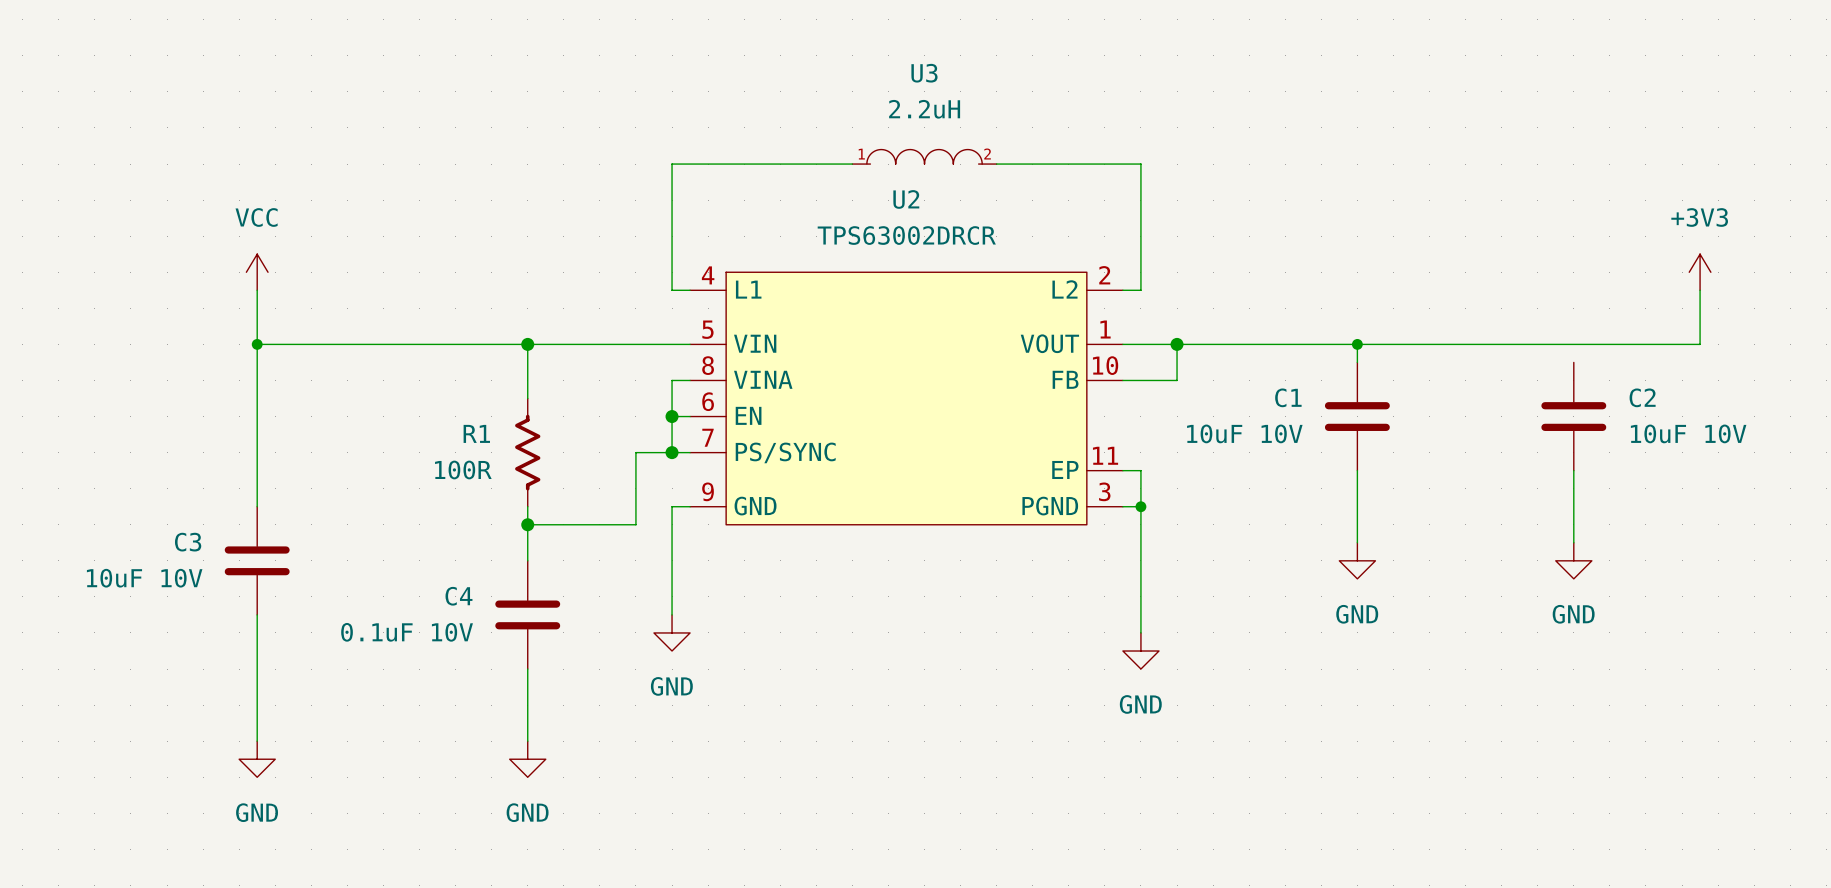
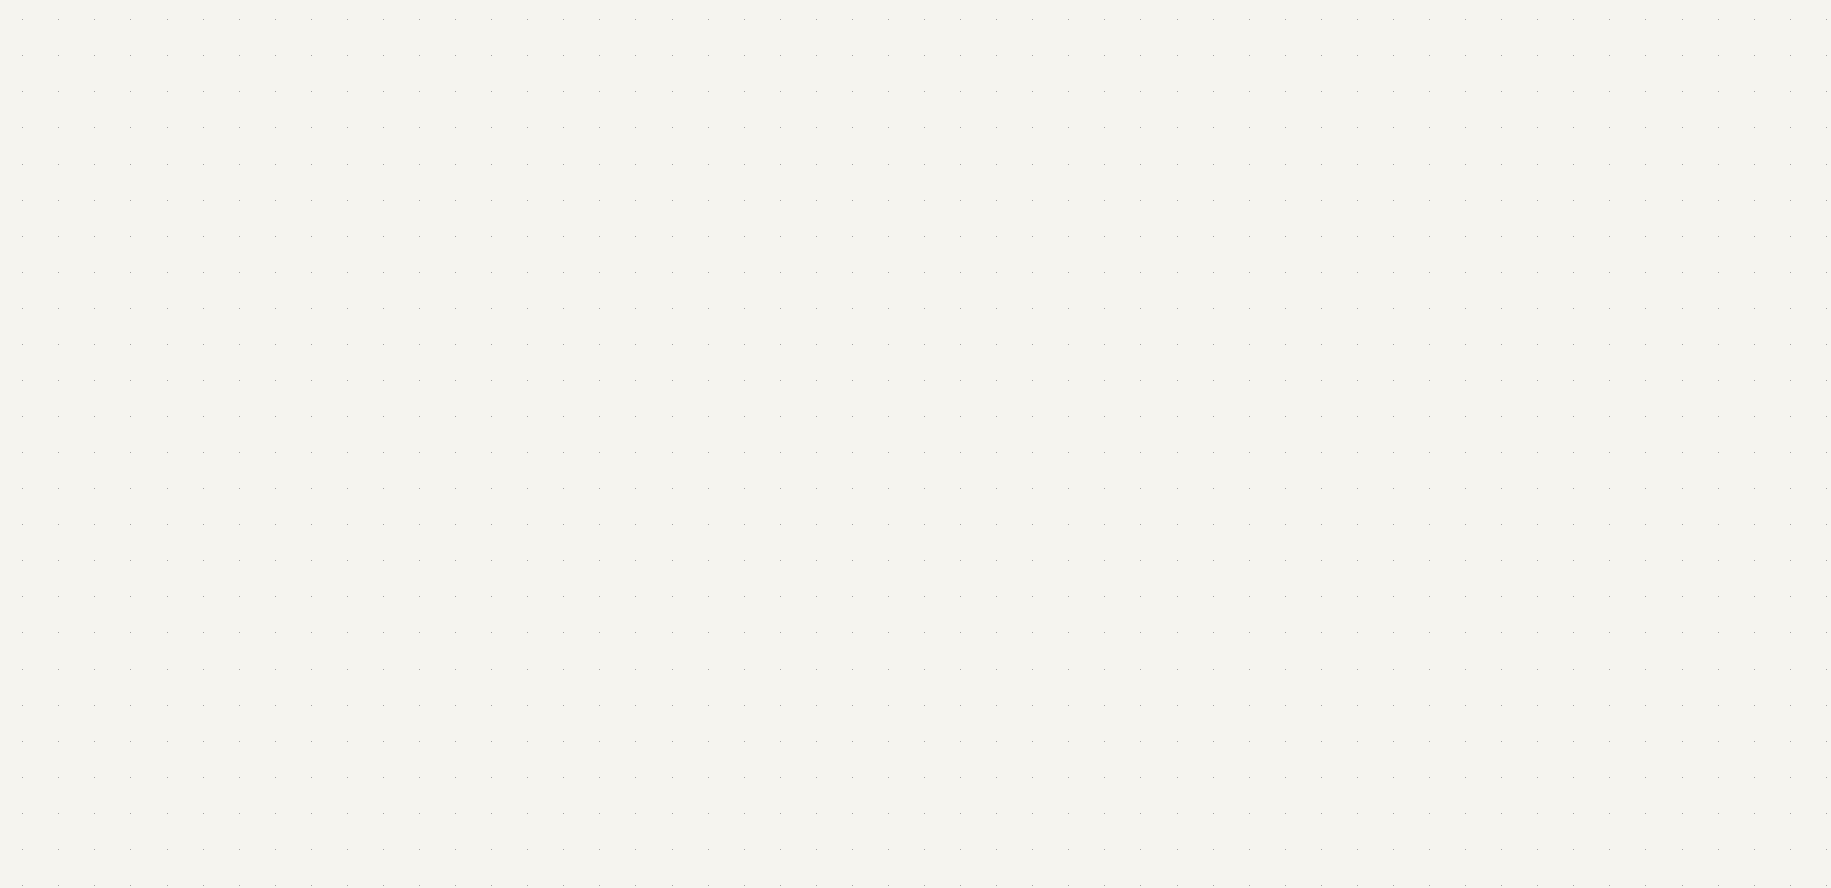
U3: 2.2uH (924, 156) -> none
wire: (852, 164) (672, 164) (672, 290) (690, 290) -> none
wire: (996, 164) (1140, 164) (1140, 290) (1122, 290) -> none
power symbol: VCC (257, 272) -> none
power symbol: +3V3 (1700, 272) -> none
wire: (257, 290) (257, 506) -> none
wire: (1700, 290) (1700, 344) (1122, 344) -> none
wire: (257, 344) (690, 344) -> none
junction: (257, 344) -> none
wire: (527, 344) (527, 398) -> none
junction: (527, 344) -> none
wire: (1177, 344) (1177, 380) (1122, 380) -> none
junction: (1177, 344) -> none
wire: (1357, 344) (1357, 362) -> none
junction: (1357, 344) -> none
wire: (690, 380) (672, 380) (672, 452) -> none
U2: TPS63002DRCR (906, 398) -> none
wire: (672, 416) (690, 416) -> none
junction: (672, 416) -> none
C1: 10uF 10V (1357, 416) -> none
C2: 10uF 10V (1573, 416) -> none
R1: 100R (527, 452) -> none
junction: (672, 452) -> none
wire: (690, 452) (635, 452) (635, 524) (527, 524) -> none
wire: (1122, 470) (1140, 470) (1140, 632) -> none
wire: (1357, 470) (1357, 542) -> none
wire: (1573, 470) (1573, 542) -> none
wire: (527, 506) (527, 560) -> none
wire: (690, 506) (672, 506) (672, 614) -> none
wire: (1122, 506) (1140, 506) -> none
junction: (1140, 506) -> none
junction: (527, 524) -> none
C3: 10uF 10V (257, 560) -> none
power symbol: GND (1357, 560) -> none
power symbol: GND (1573, 560) -> none
wire: (257, 614) (257, 741) -> none
C4: 0.1uF 10V (527, 614) -> none
power symbol: GND (672, 632) -> none
power symbol: GND (1140, 651) -> none
wire: (527, 669) (527, 741) -> none
power symbol: GND (257, 759) -> none
power symbol: GND (527, 759) -> none

